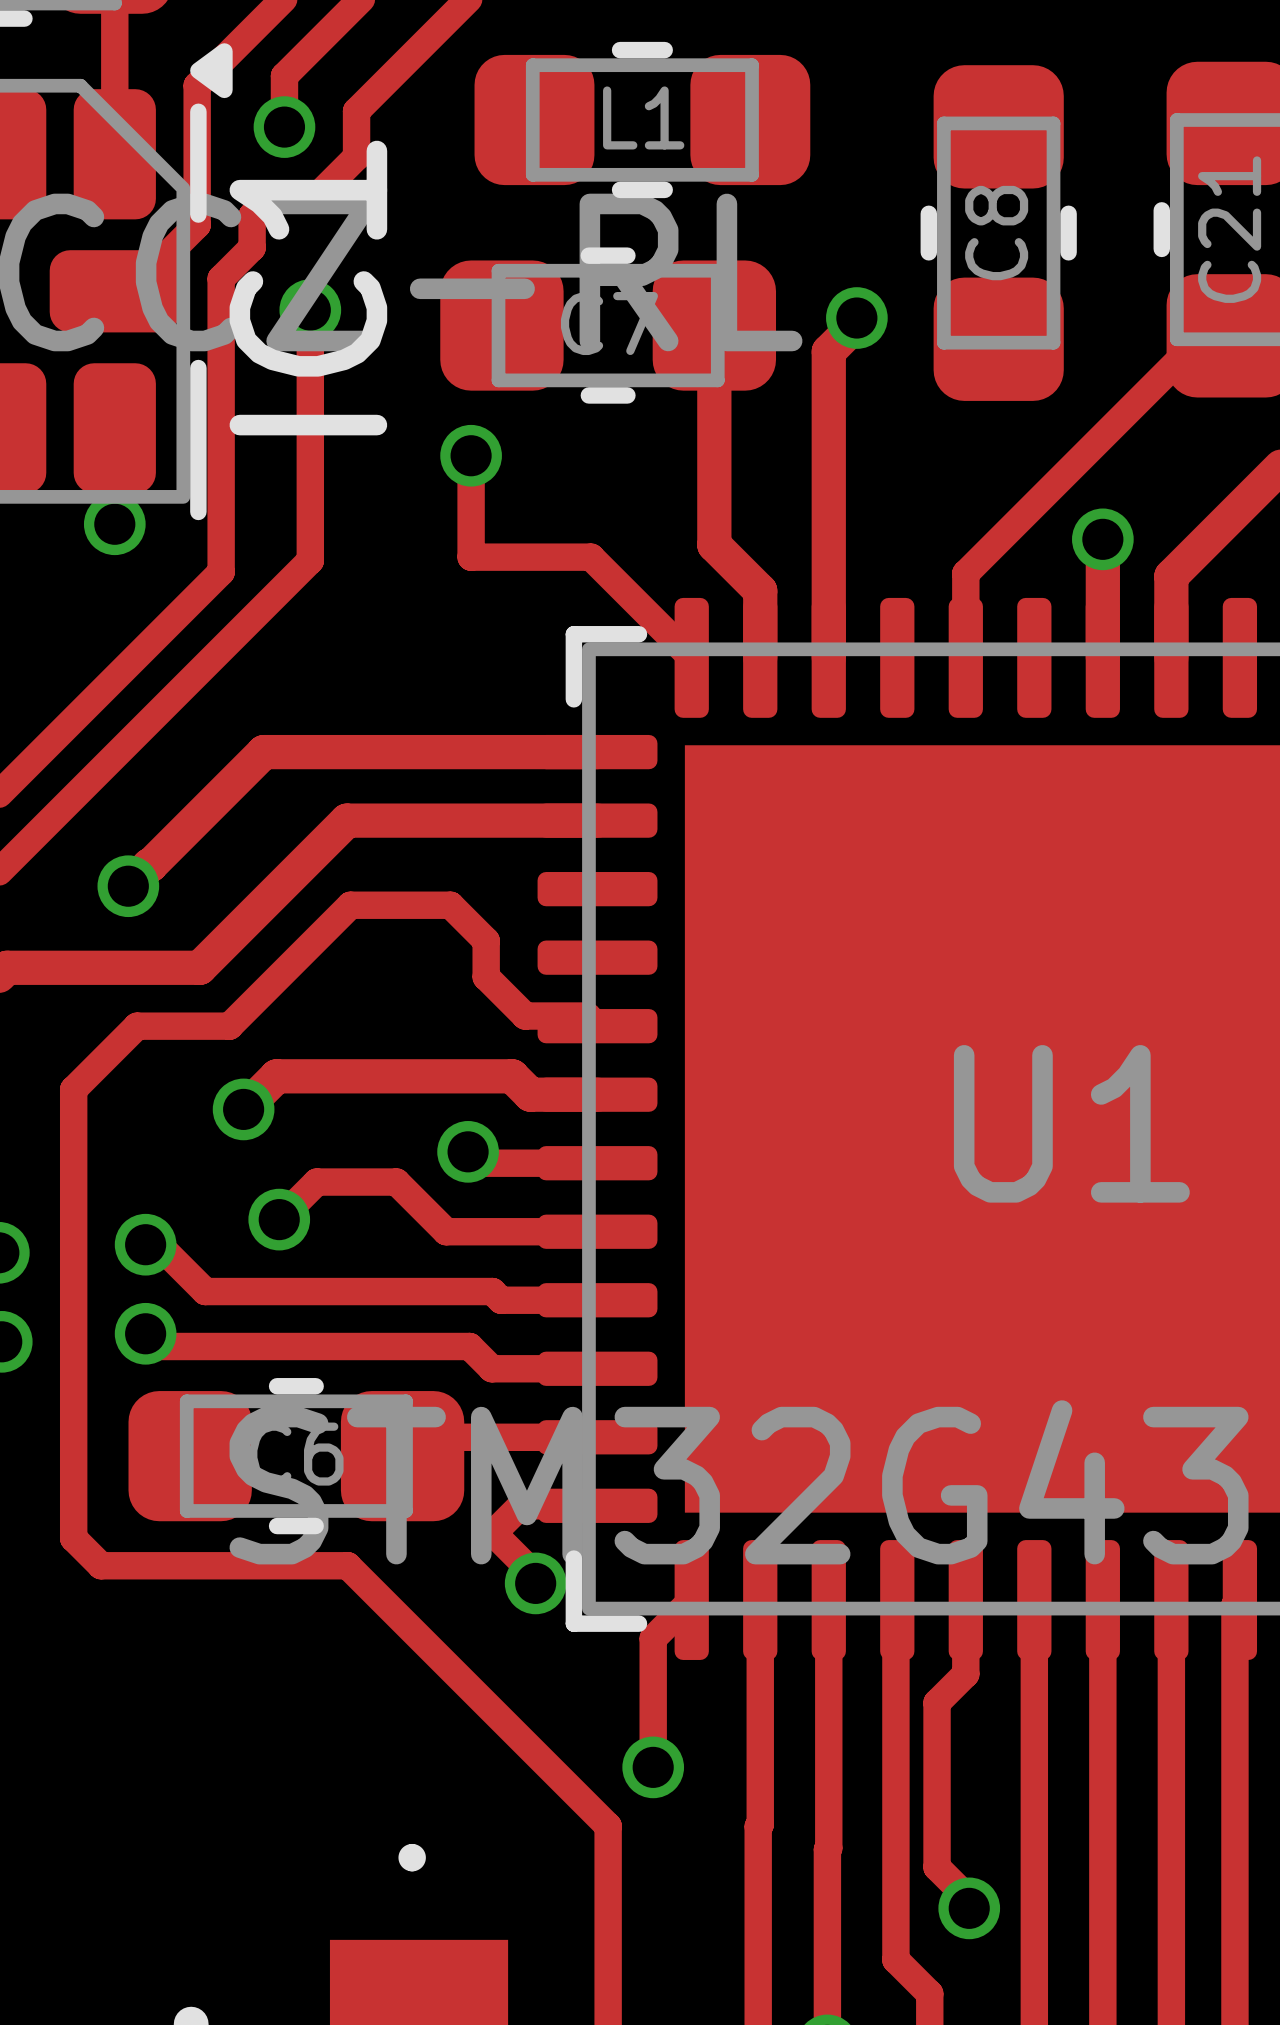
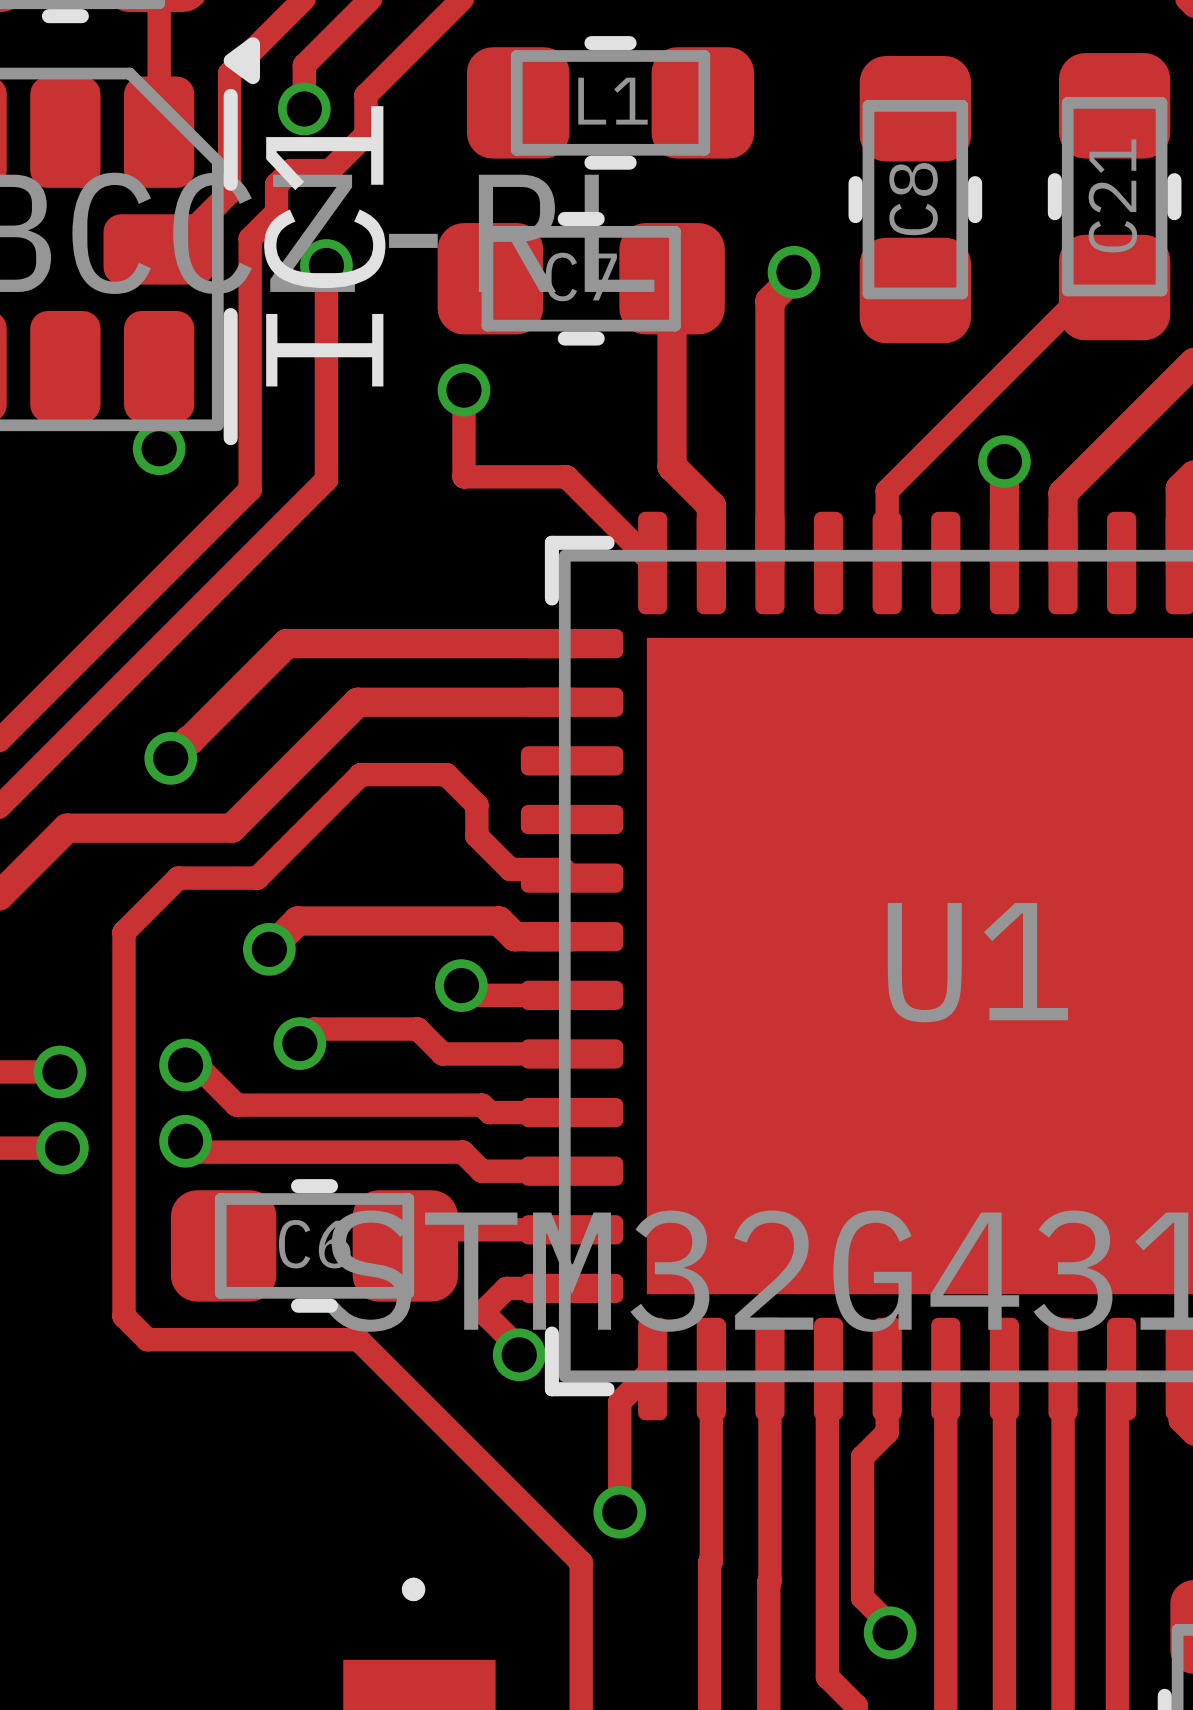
track: (296, 1202) (316, 1182) (396, 1182) (417, 1202) -> (314, 1029) (417, 1029)

